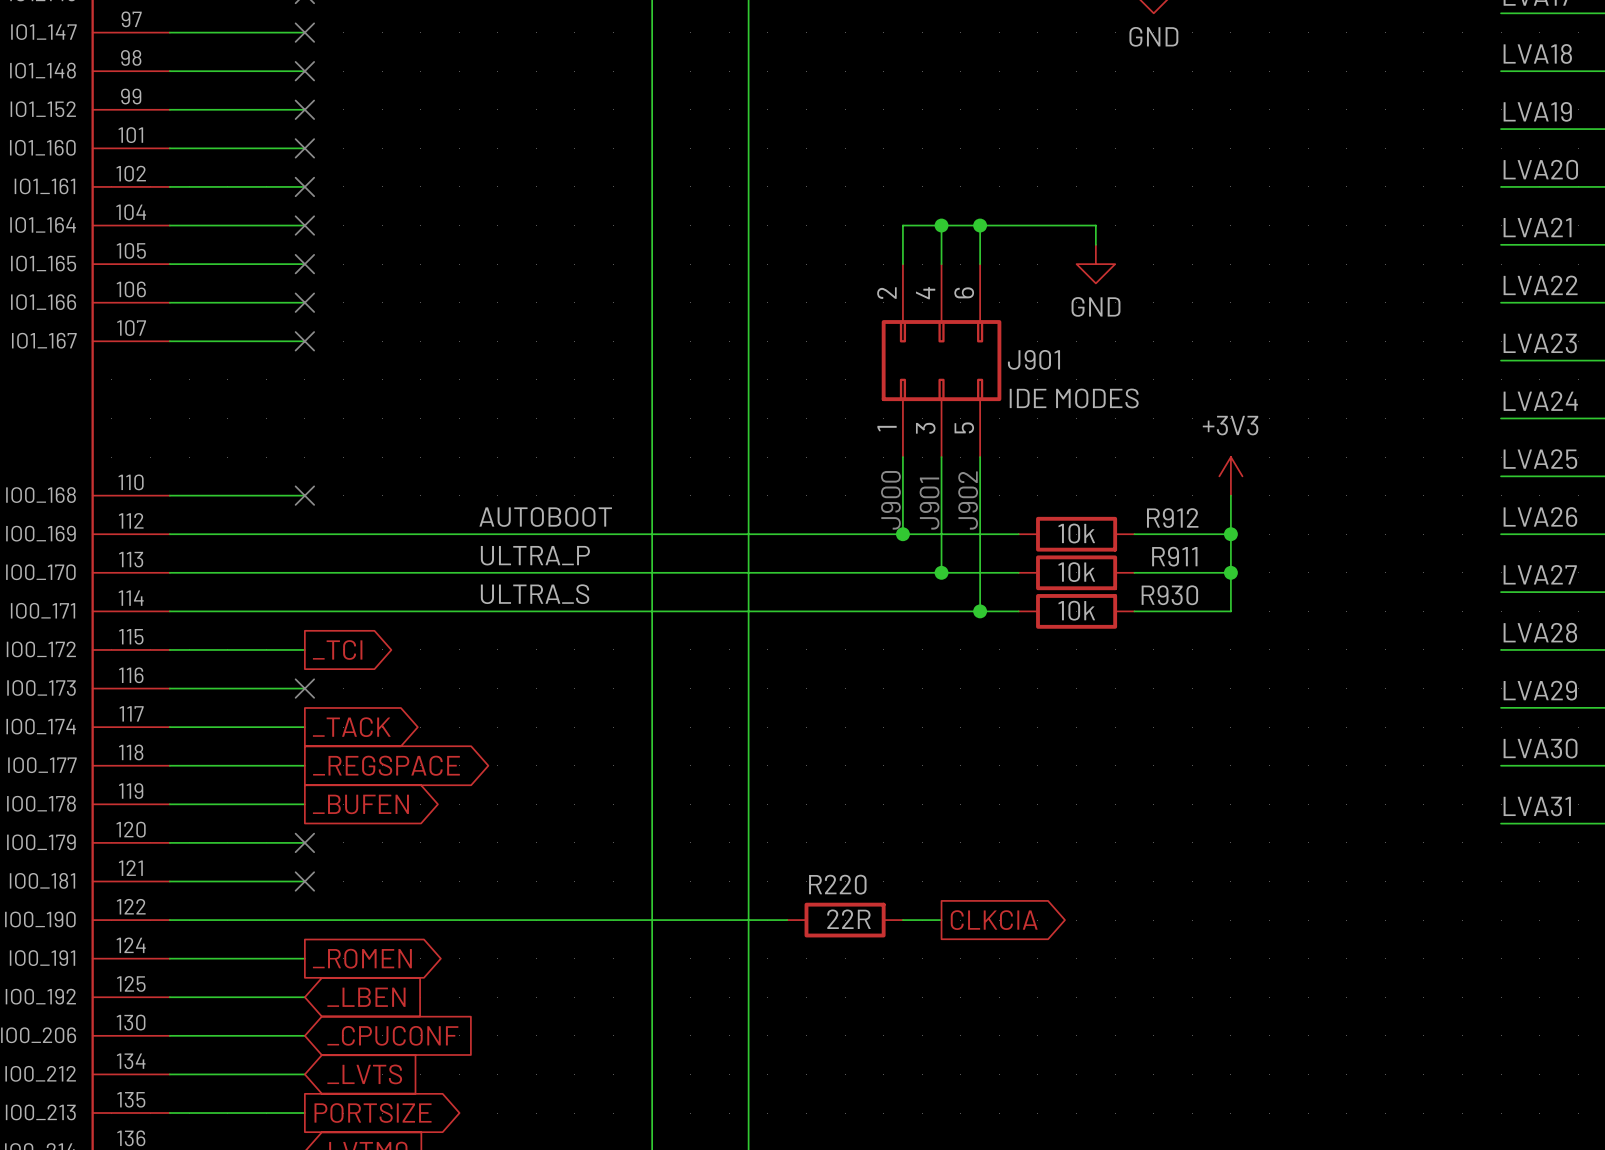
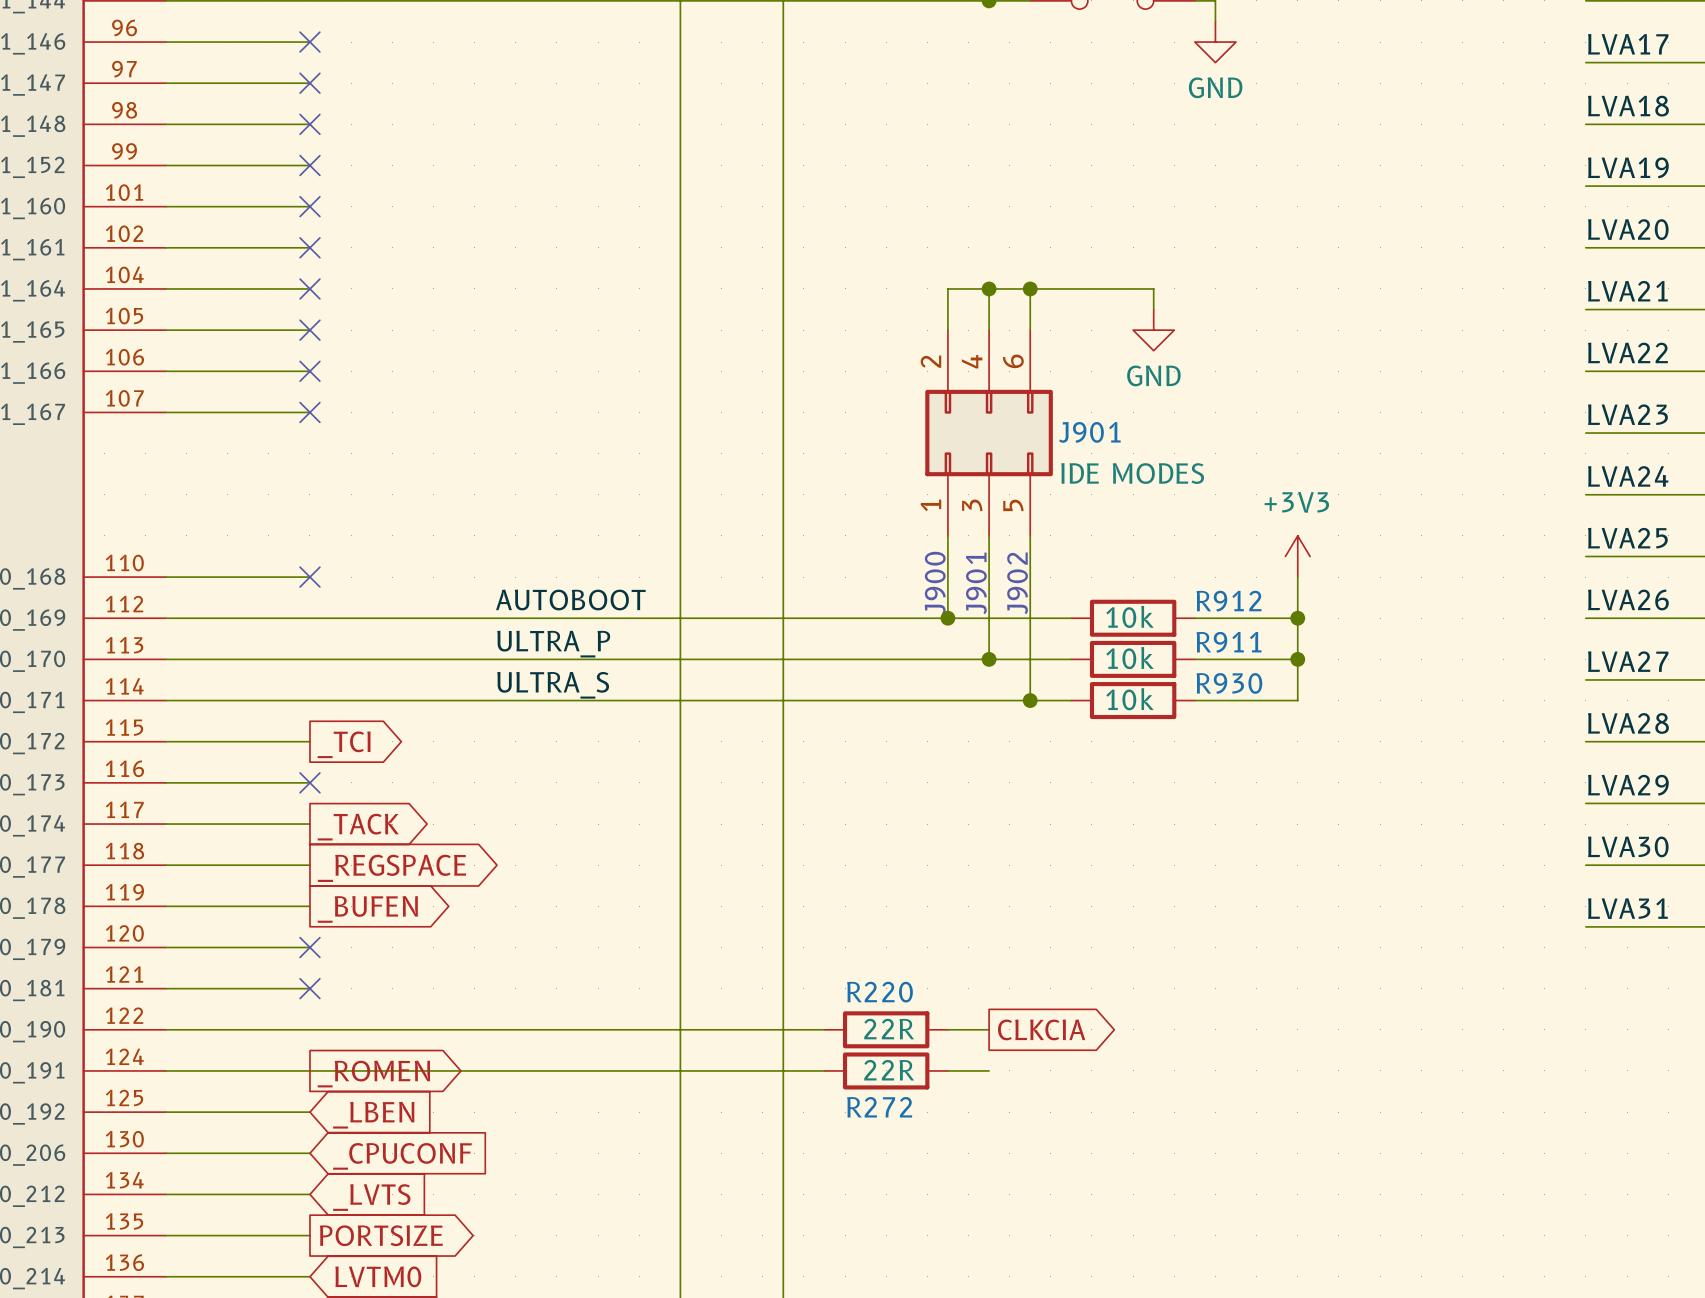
wire: none -> (309, 1070) (824, 1070)
R272: none -> 22R (886, 1070)
wire: none -> (947, 1070) (989, 1070)

